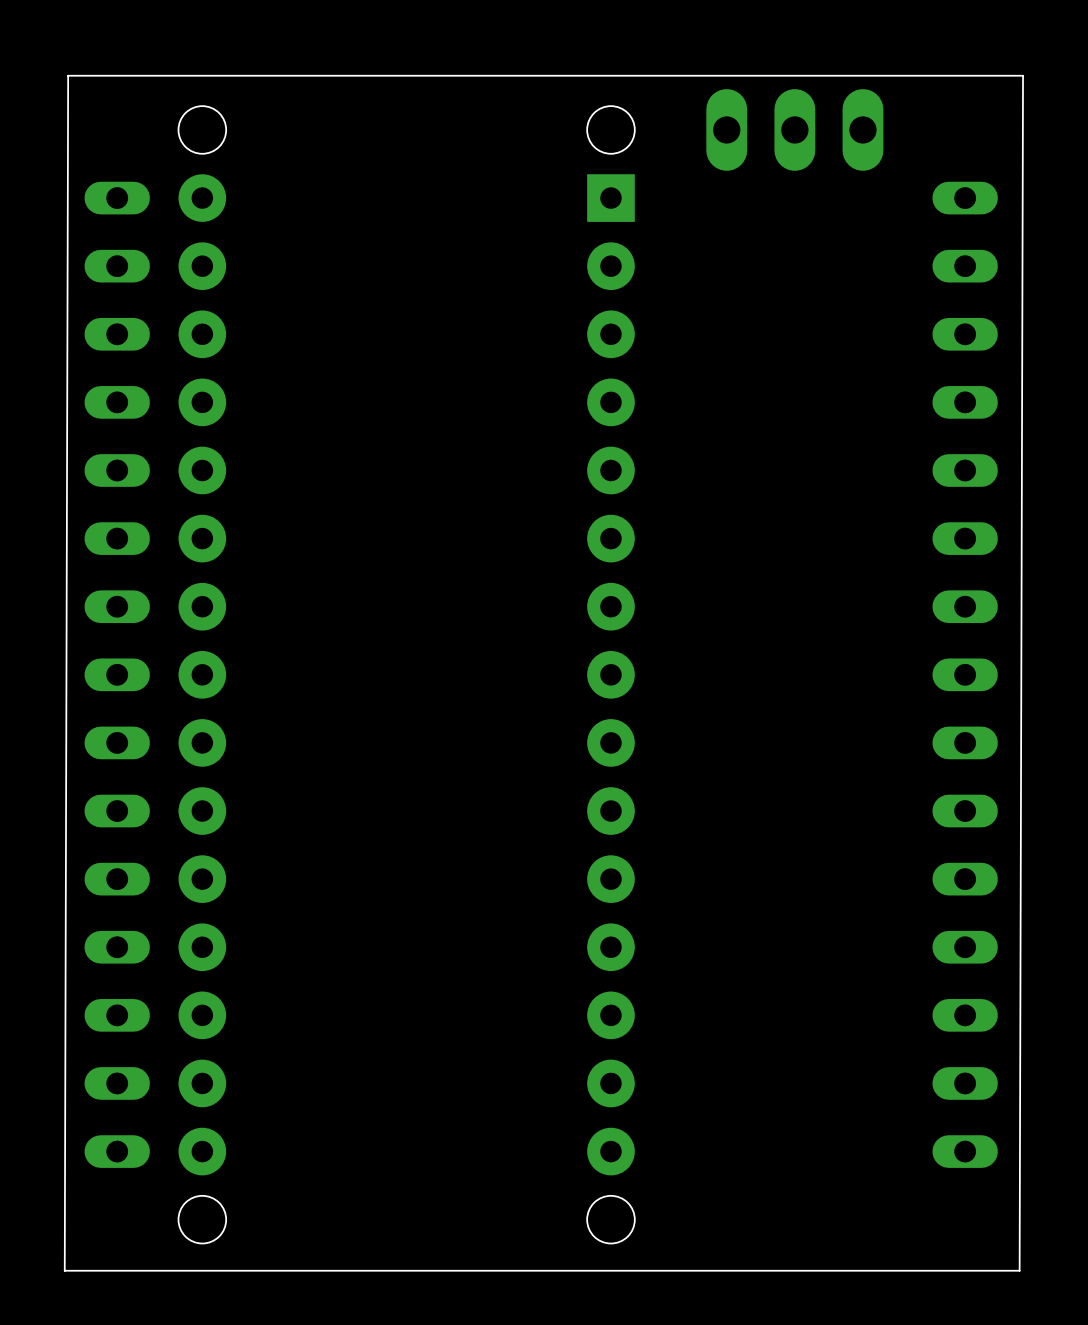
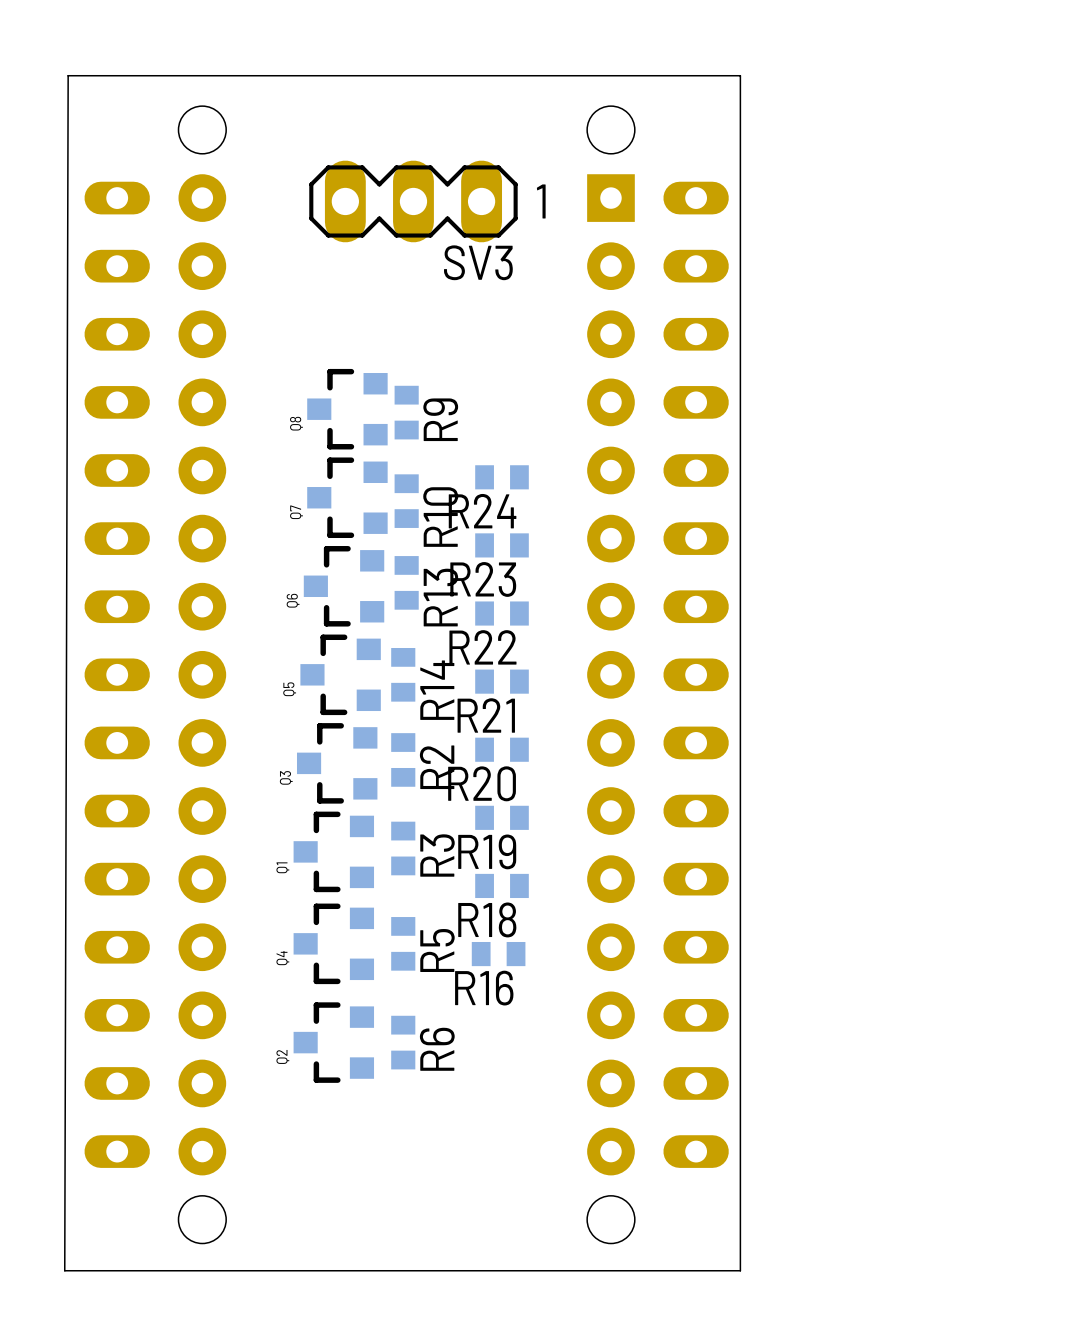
board edge: (740, 75) (1023, 75) (1019, 1270) (740, 1270) -> (740, 75) (740, 1270)
SV3 side: top (794, 129) -> bottom (413, 201)
Q8: none -> (347, 409)
R9: none -> (406, 412)
R24: none -> (502, 477)
Q7: none -> (347, 497)
R10: none -> (406, 501)
R23: none -> (502, 545)
R13: none -> (406, 582)
Q6: none -> (344, 586)
R22: none -> (502, 613)
Q5: none -> (340, 674)
R14: none -> (403, 674)
part position: (965, 674) -> (696, 674)
R21: none -> (502, 681)
R20: none -> (502, 749)
R2: none -> (403, 759)
Q3: none -> (337, 763)
R19: none -> (502, 817)
R3: none -> (403, 848)
Q1: none -> (333, 851)
R18: none -> (502, 885)
Q4: none -> (333, 943)
R5: none -> (403, 943)
R16: none -> (498, 954)
Q2: none -> (333, 1042)
R6: none -> (403, 1042)

